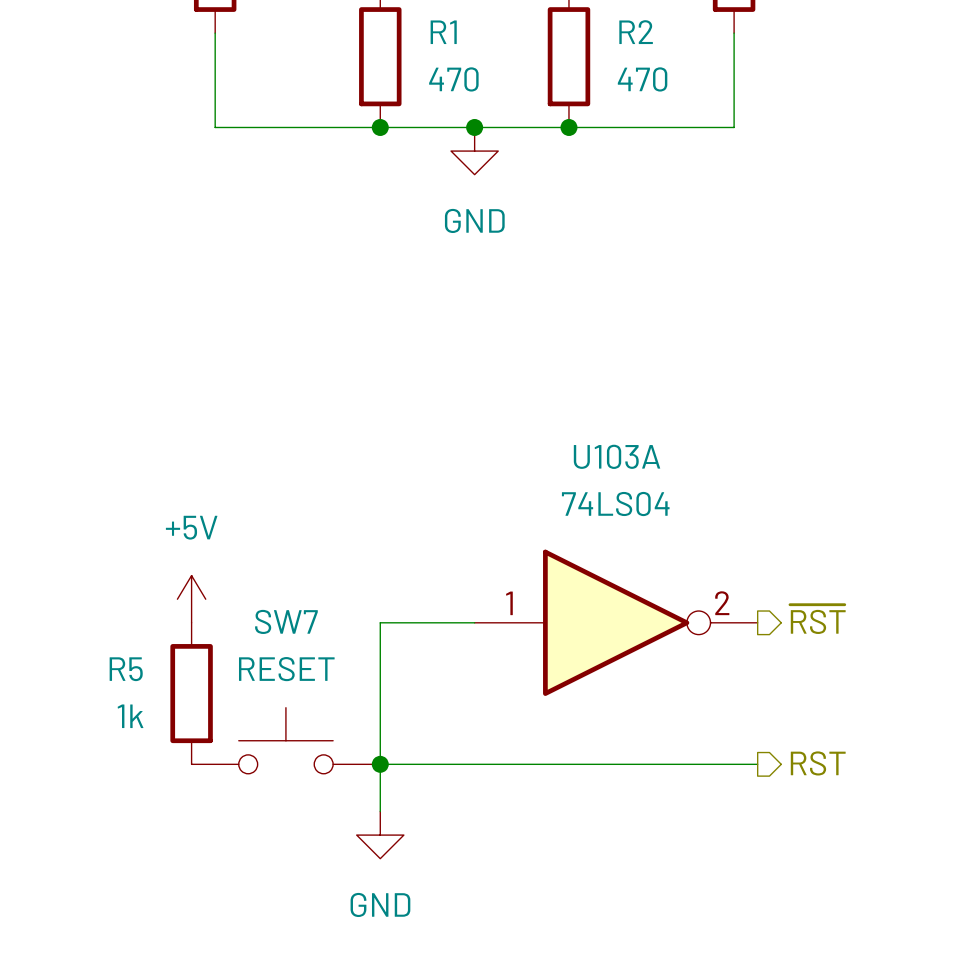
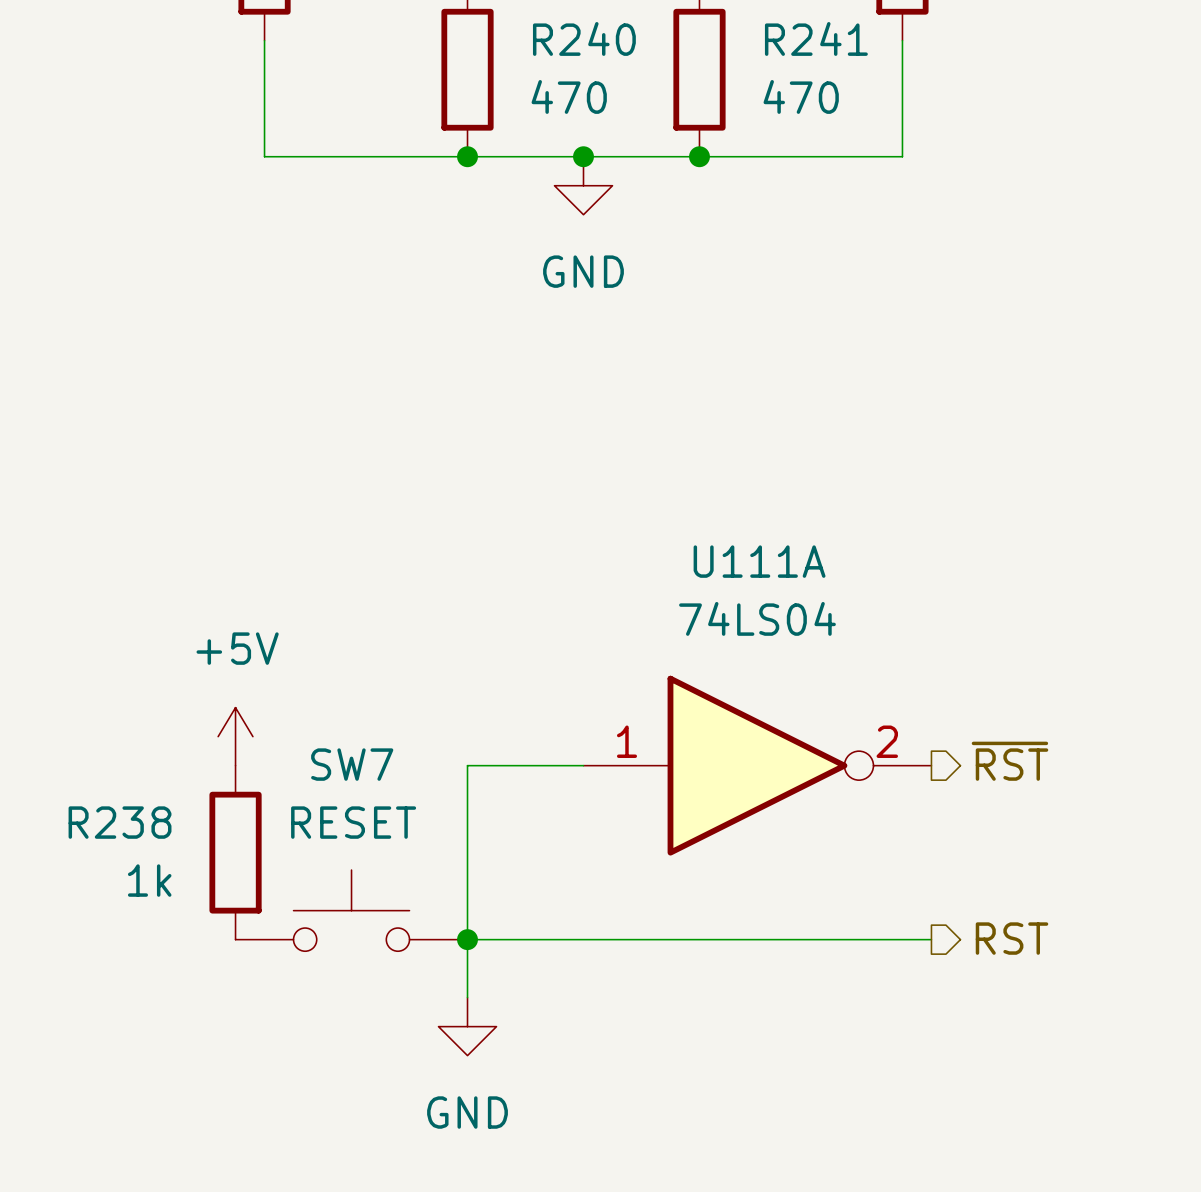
R1 name: R1 (443, 32) -> R240 (584, 38)
R2 name: R2 (636, 32) -> R241 (816, 38)
U103A name: U103A (617, 456) -> U111A (759, 561)
R5 name: R5 (126, 669) -> R238 (120, 822)

